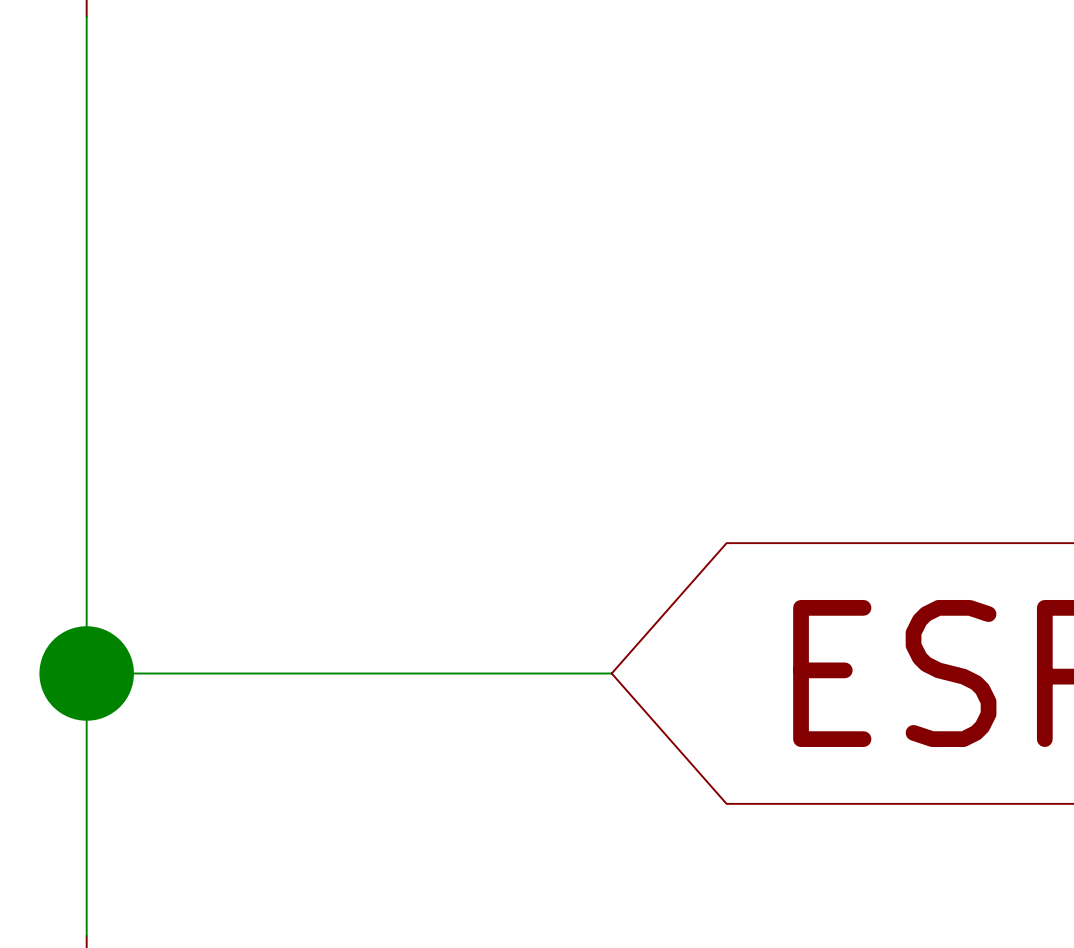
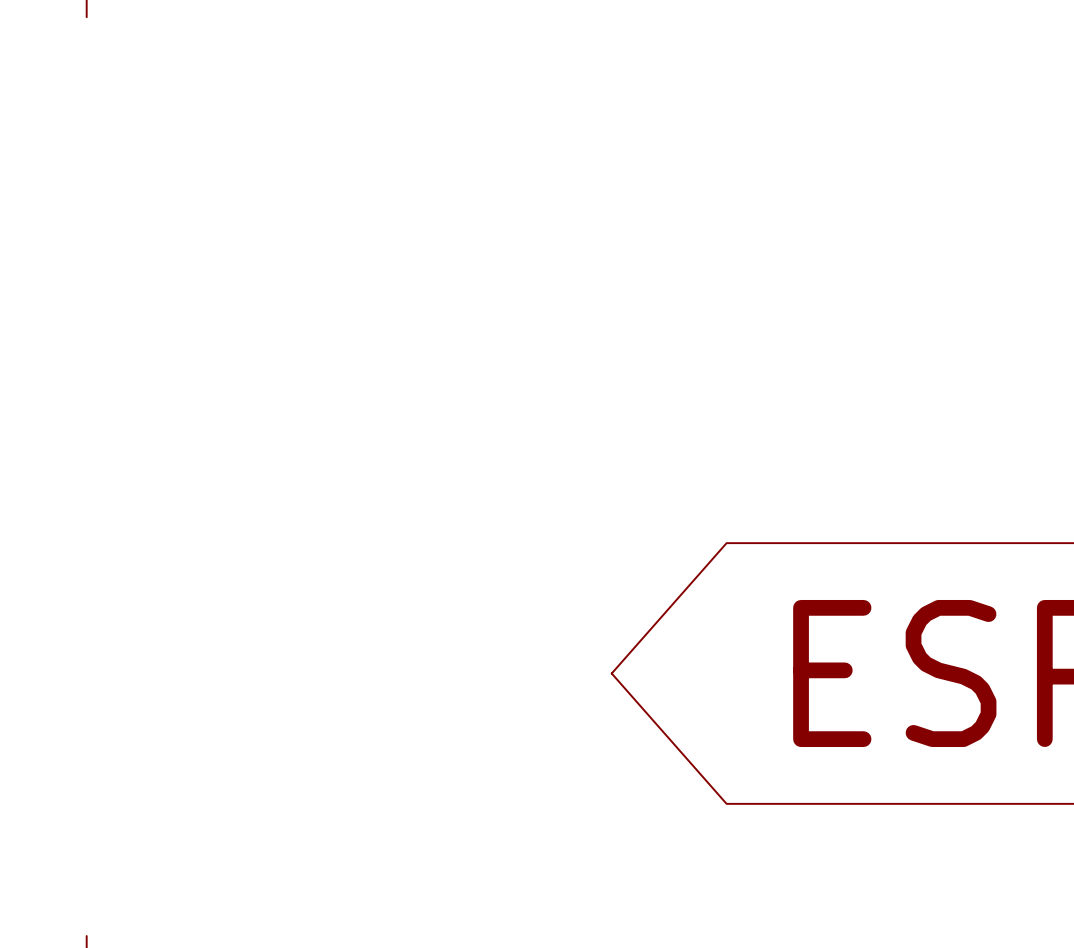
wire: (86, 17) (86, 936) -> none
wire: (86, 673) (611, 673) -> none
junction: (86, 673) -> none

